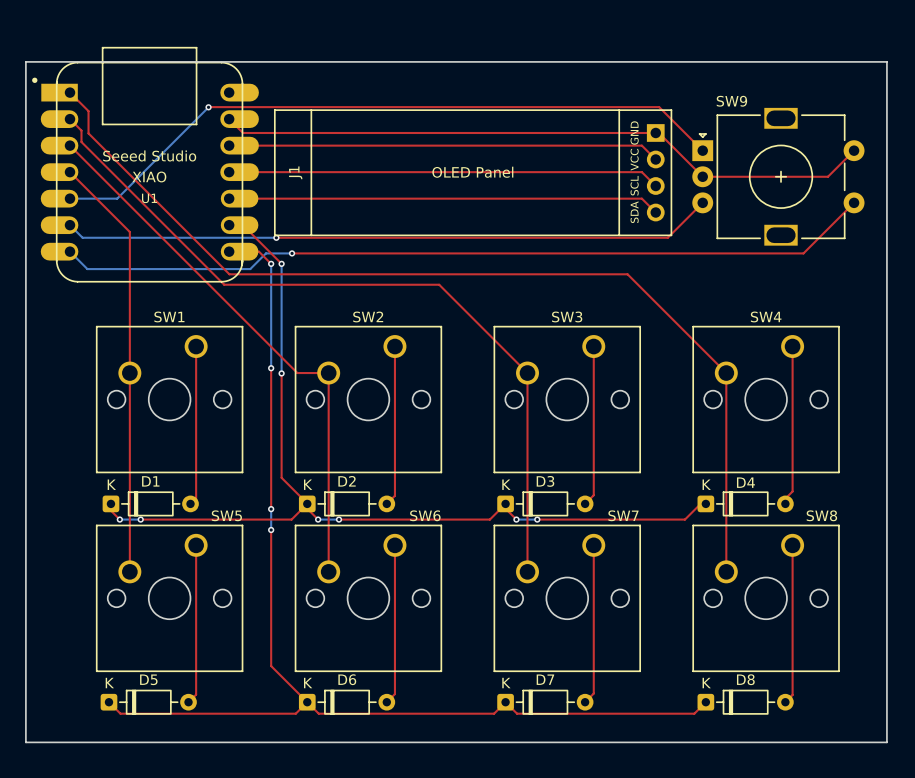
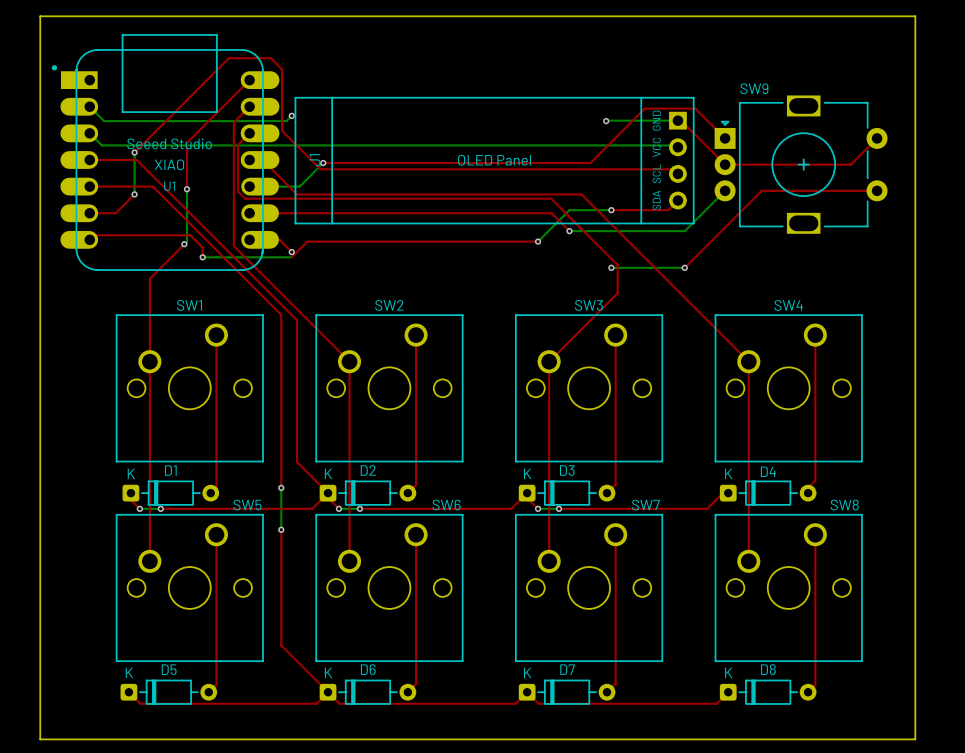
board edge: (25, 61) (886, 61) (886, 742) (25, 742) (25, 61) -> (40, 16) (40, 739) (915, 739) (915, 16) (40, 16)
top track: (70, 92) (88, 111) (88, 133) (229, 274) (627, 274) -> none
top track: none -> (249, 80) (186, 142) (186, 189)
top track: (208, 107) (659, 107) (673, 120) -> (323, 163) (590, 163) (644, 108) (695, 108)
bottom track: (208, 107) (117, 198) (70, 198) -> none
via: (208, 107) -> none
top track: (70, 119) (81, 130) (81, 142) (224, 284) (439, 284) (527, 373) -> (249, 133) (238, 144) (238, 191) (245, 198) (551, 198) (617, 265) (617, 293) (549, 361)
bottom track: none -> (89, 106) (104, 121) (286, 121) (291, 115)
top track: (229, 119) (243, 132) (655, 132) -> none
via: none -> (291, 115)
bottom track: none -> (677, 120) (606, 121)
via: none -> (606, 121)
top track: (70, 145) (297, 373) (328, 373) -> (249, 106) (233, 122) (233, 246) (349, 361)
bottom track: none -> (89, 133) (101, 145) (676, 145) (677, 147)
top track: (229, 145) (641, 145) (655, 159) -> none
top track: none -> (134, 152) (228, 58) (270, 58) (282, 69) (282, 130) (320, 169) (673, 169)
bottom track: none -> (134, 152) (134, 194)
via: none -> (134, 152)
top track: (70, 172) (129, 232) (129, 290) -> (184, 244) (149, 278)
top track: (242, 172) (641, 172) (651, 181) -> (262, 159) (297, 194) (581, 194) (649, 262)
bottom track: none -> (323, 163) (299, 186) (249, 186)
via: none -> (323, 163)
top track: none -> (89, 186) (152, 186) (281, 314) (281, 487)
top track: (229, 198) (641, 198) (655, 212) -> (611, 210) (668, 210) (677, 200)
bottom track: none -> (186, 189) (186, 241) (184, 244)
via: none -> (186, 189)
top track: (702, 202) (667, 237) (276, 237) -> none
bottom track: none -> (725, 190) (684, 231) (569, 231)
top track: (854, 202) (803, 253) (516, 253) -> (877, 190) (761, 190) (684, 267)
top track: none -> (134, 194) (115, 213) (89, 213)
via: none -> (134, 194)
bottom track: none -> (611, 210) (569, 210) (538, 241)
via: none -> (611, 210)
bottom track: (70, 225) (82, 237) (276, 237) -> none
top track: (242, 225) (281, 263) -> (263, 213) (551, 213) (569, 231)
via: (276, 237) -> none
via: none -> (569, 231)
top track: none -> (89, 239) (94, 235) (190, 235) (202, 247) (202, 257)
bottom track: (70, 251) (87, 269) (182, 269) -> none
top track: none -> (312, 241) (307, 241) (291, 257)
bottom track: (292, 253) (265, 253) (250, 269) -> (291, 257) (270, 257)
via: (292, 253) -> none
via: none -> (538, 241)
via: none -> (184, 244)
bottom track: (271, 263) (271, 368) -> none
bottom track: (281, 263) (281, 373) -> none
via: (281, 263) -> none
via: none -> (202, 257)
bottom track: none -> (611, 267) (684, 267)
via: none -> (611, 267)
via: none -> (684, 267)
top track: (271, 368) (271, 509) -> none
via: (271, 368) -> none
top track: (281, 373) (281, 477) (307, 503) -> (89, 159) (136, 159) (297, 320) (297, 462) (328, 493)
via: (281, 373) -> none
bottom track: none -> (281, 487) (281, 529)
bottom track: (271, 509) (271, 530) -> none
via position: (271, 509) -> (281, 487)
top track: (271, 530) (271, 666) -> (281, 529) (281, 645) (291, 655)
via position: (271, 530) -> (281, 529)

